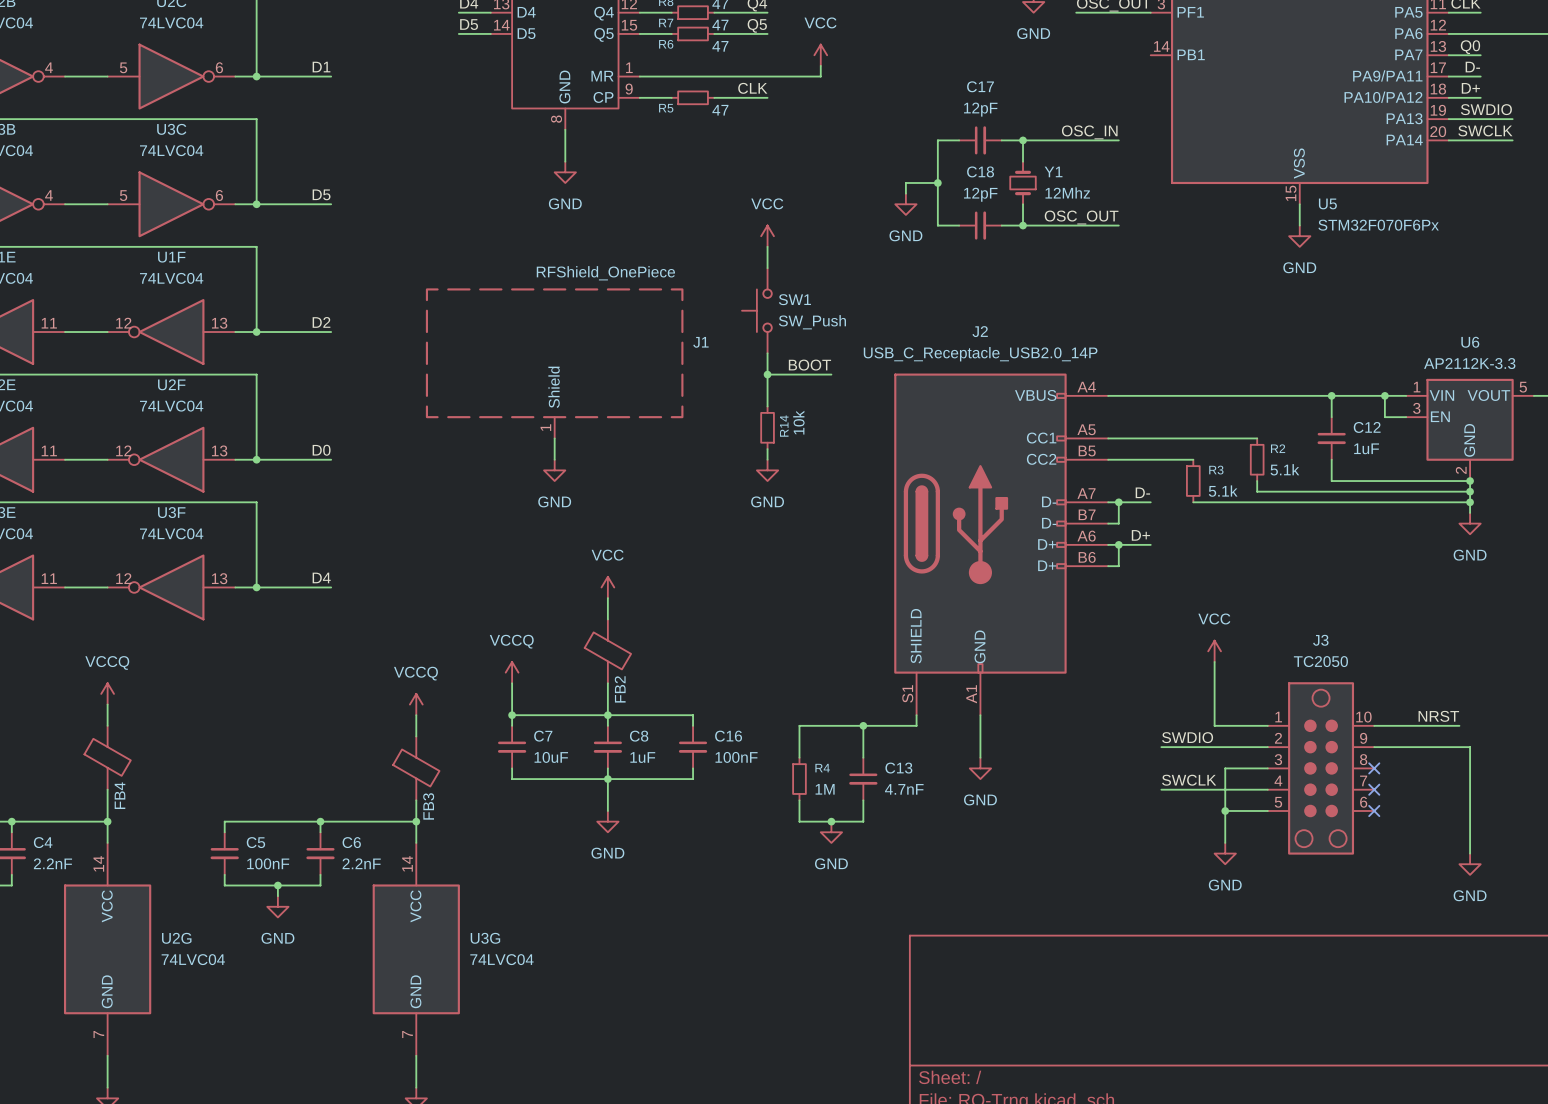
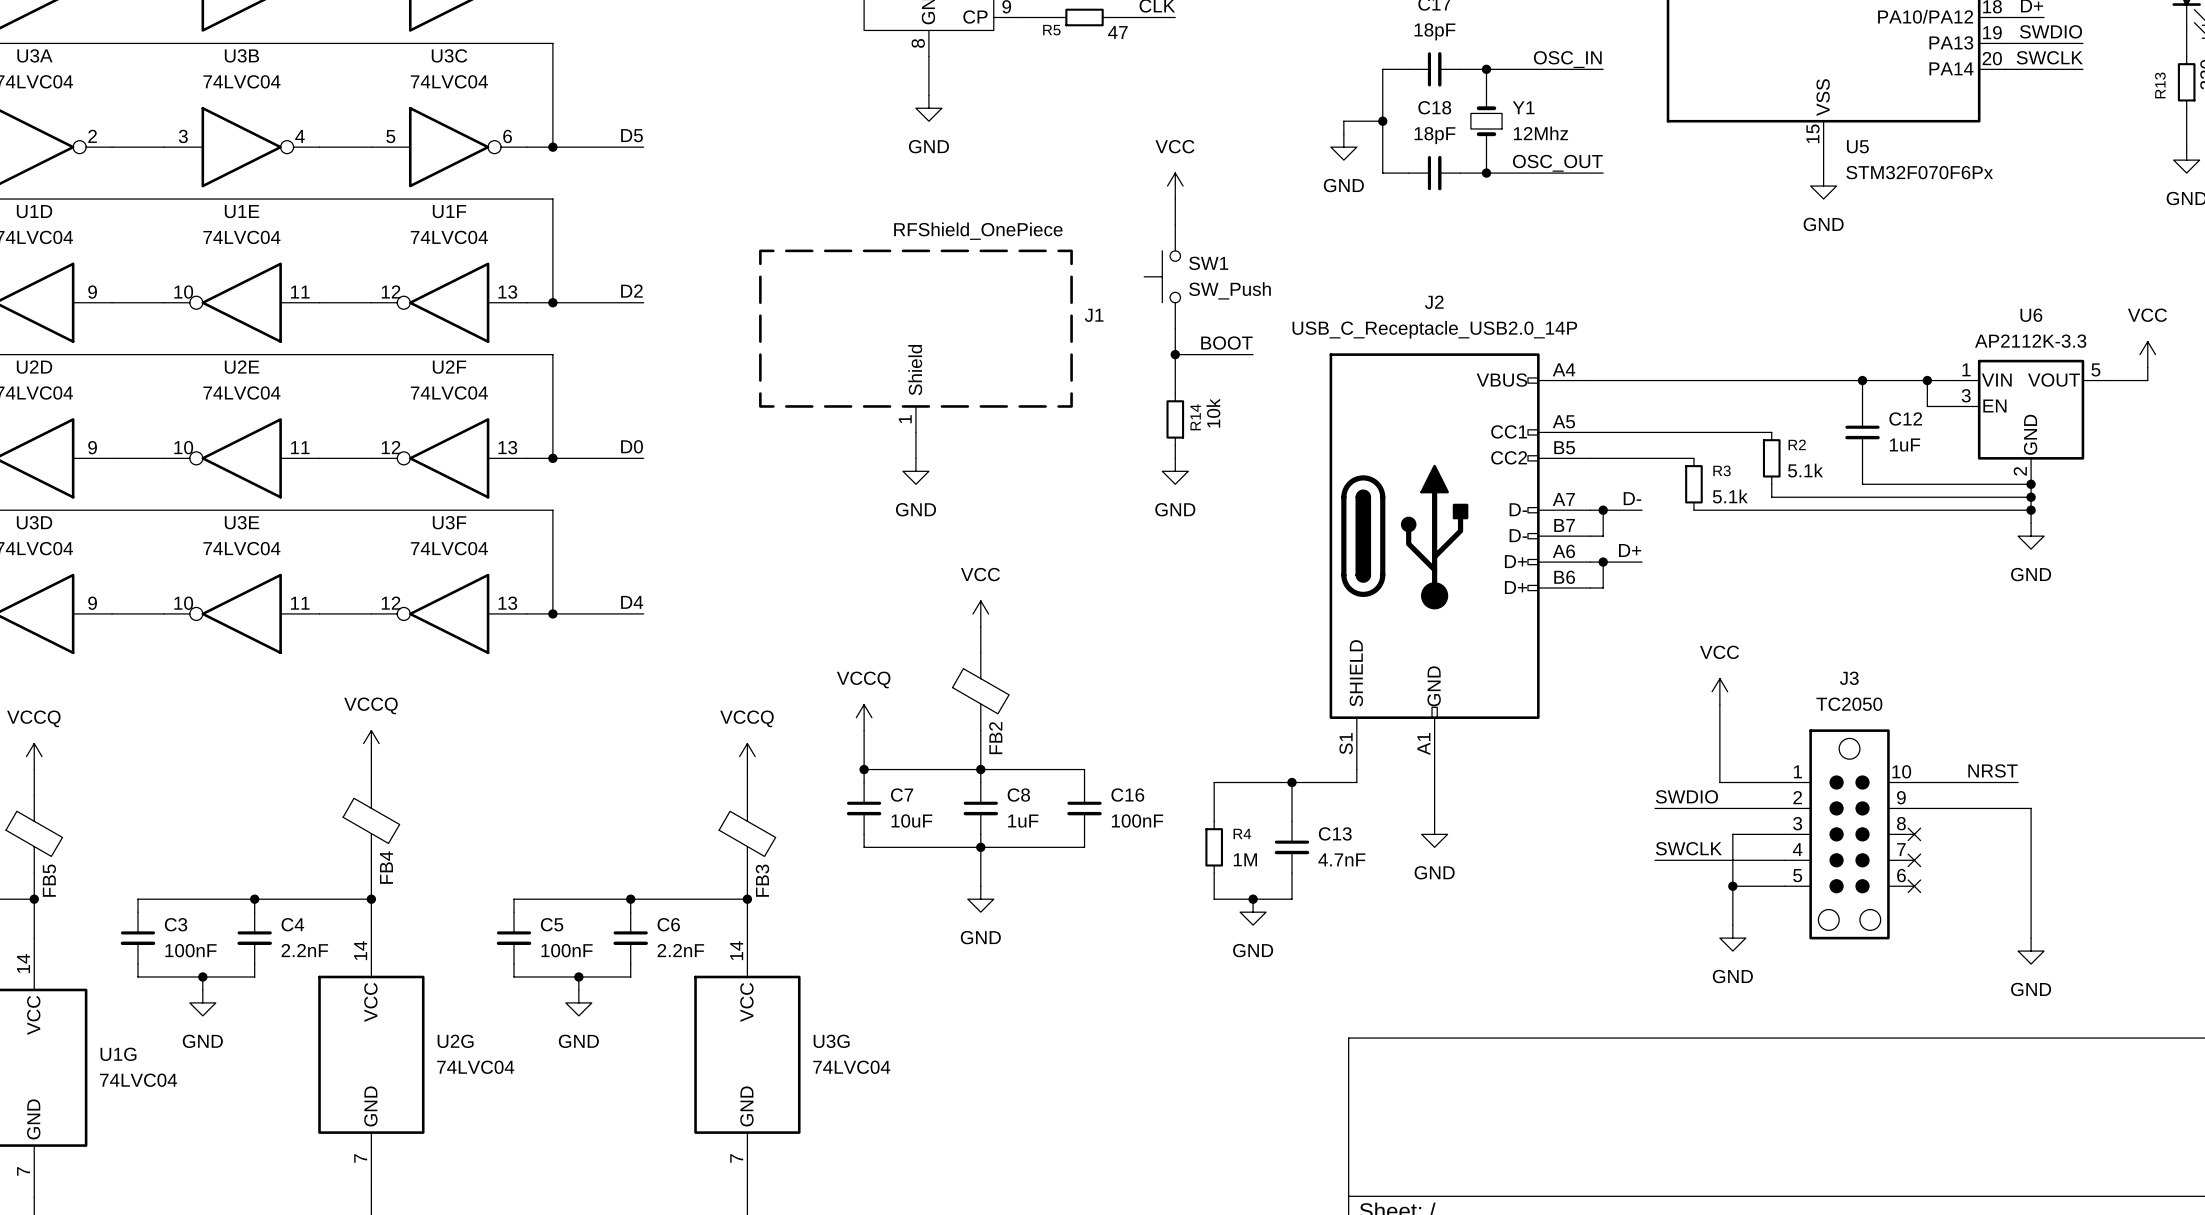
C17 value: 12pF (980, 109) -> 18pF (1435, 31)
C18 value: 12pF (980, 194) -> 18pF (1435, 135)

